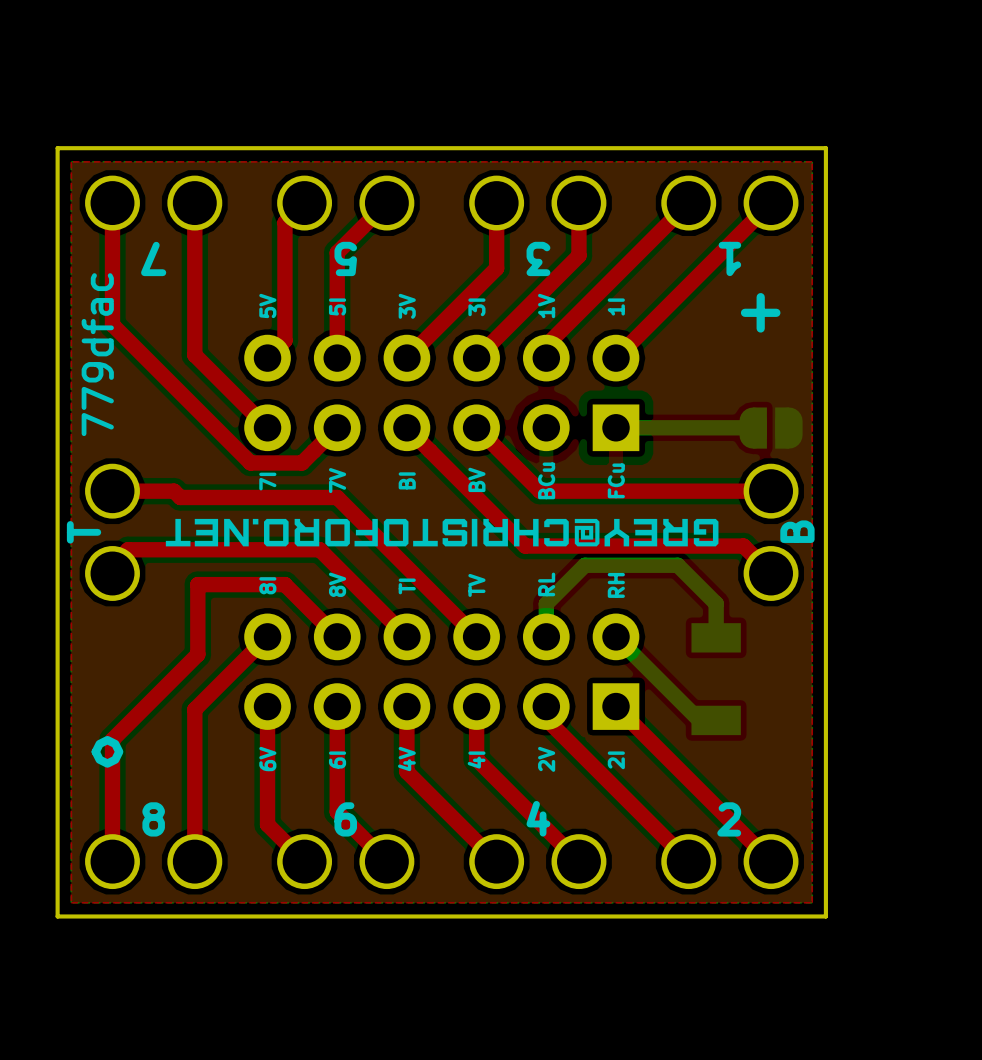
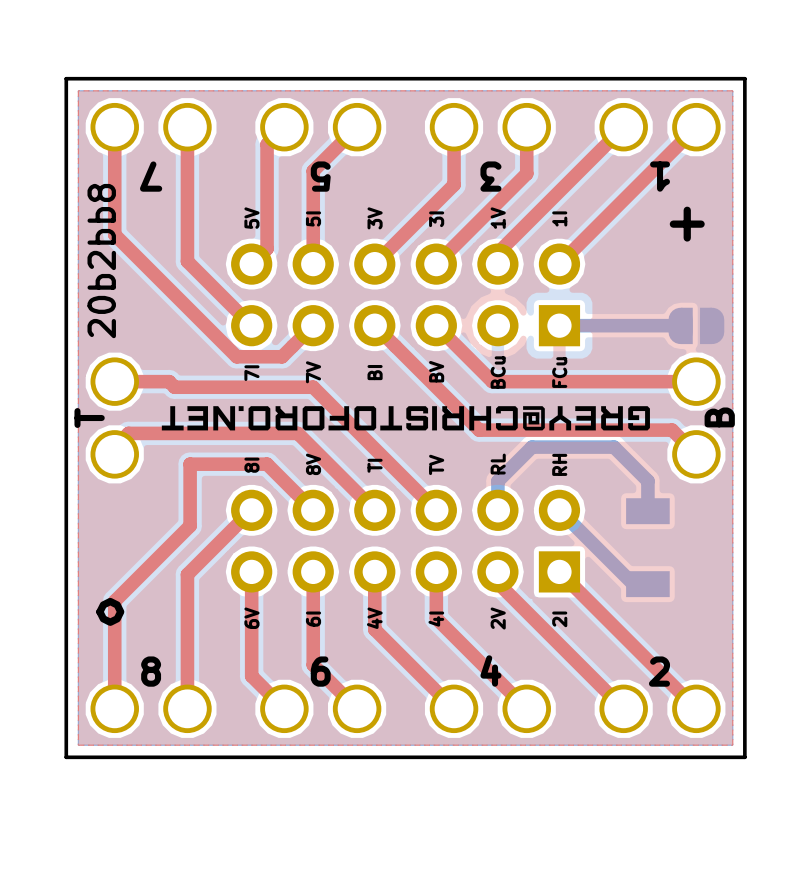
text: 779dfac (97, 354) -> 20b2bb8 (101, 261)

